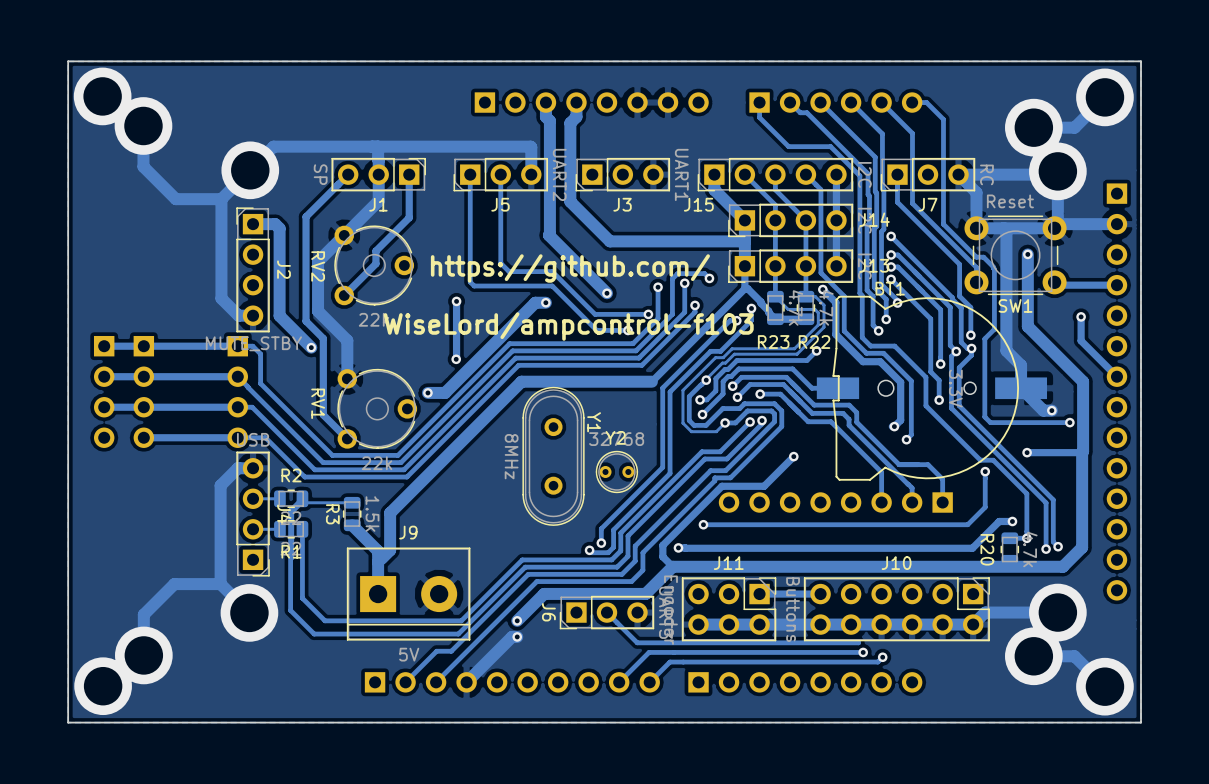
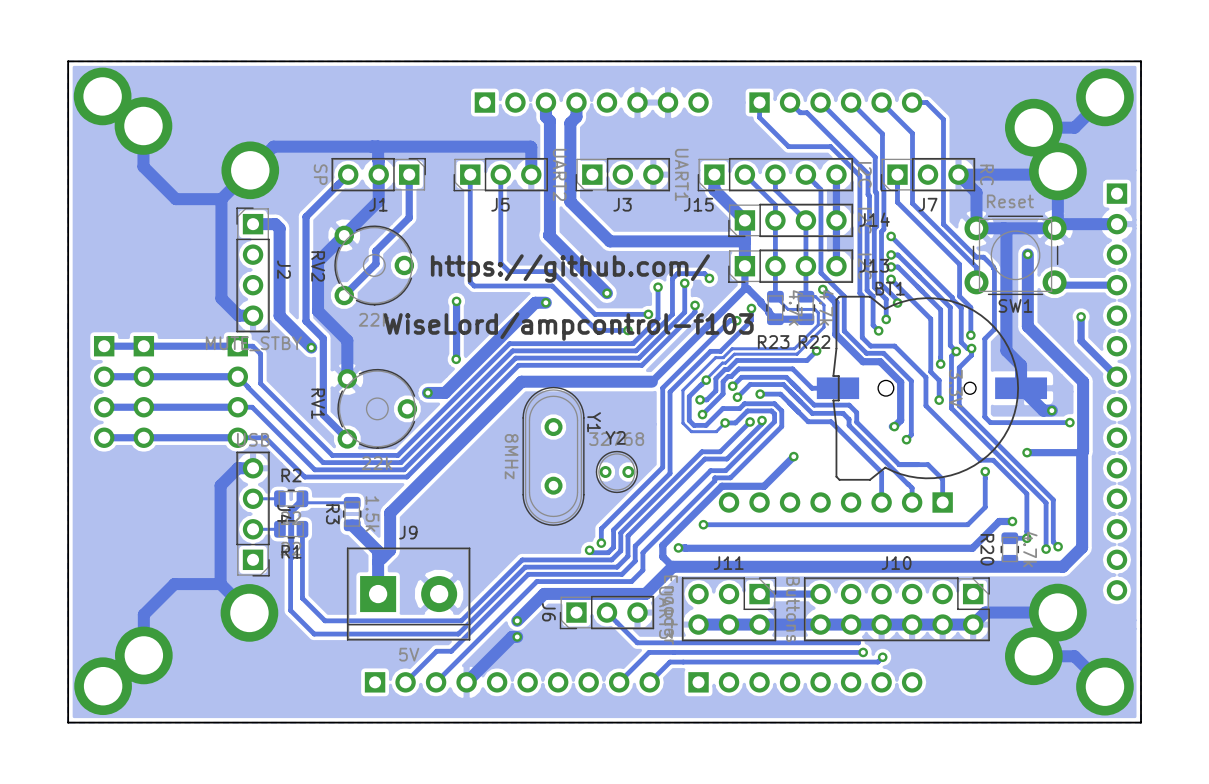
track: none -> (143, 437) (104, 437)

